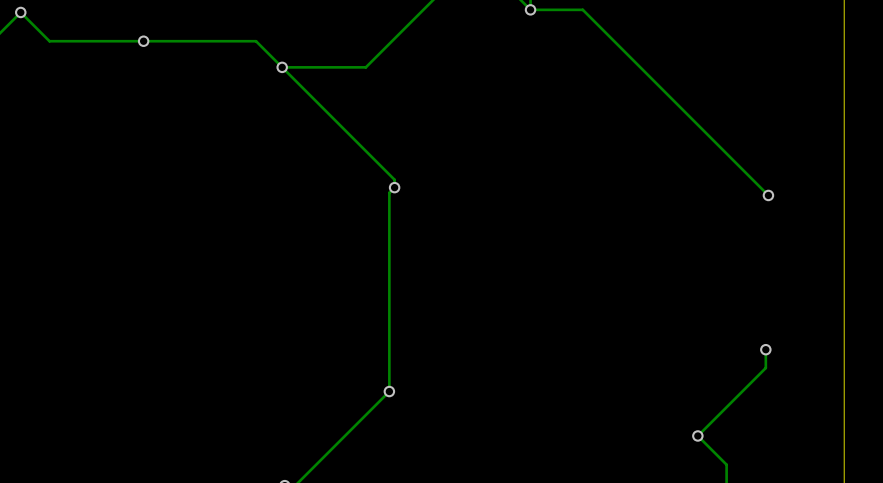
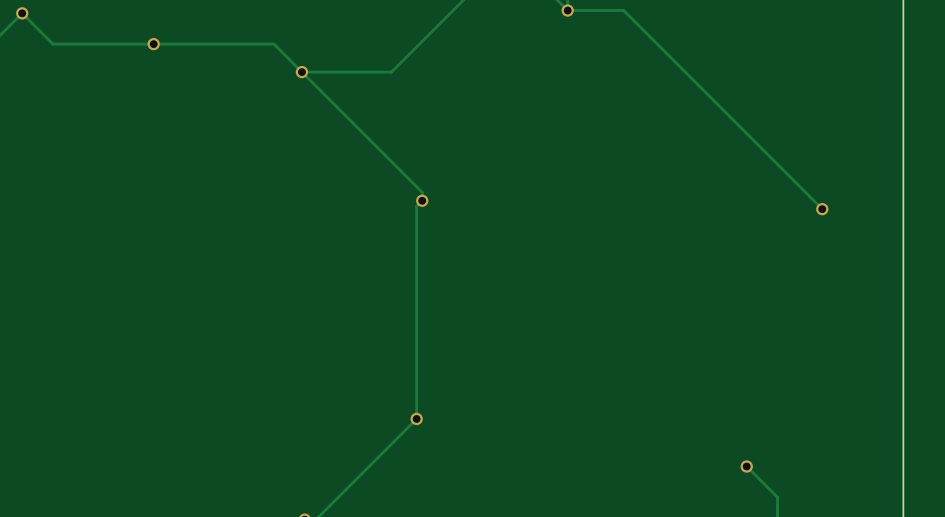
track: (765, 349) (765, 368) (697, 435) -> none
via: (765, 349) -> none

